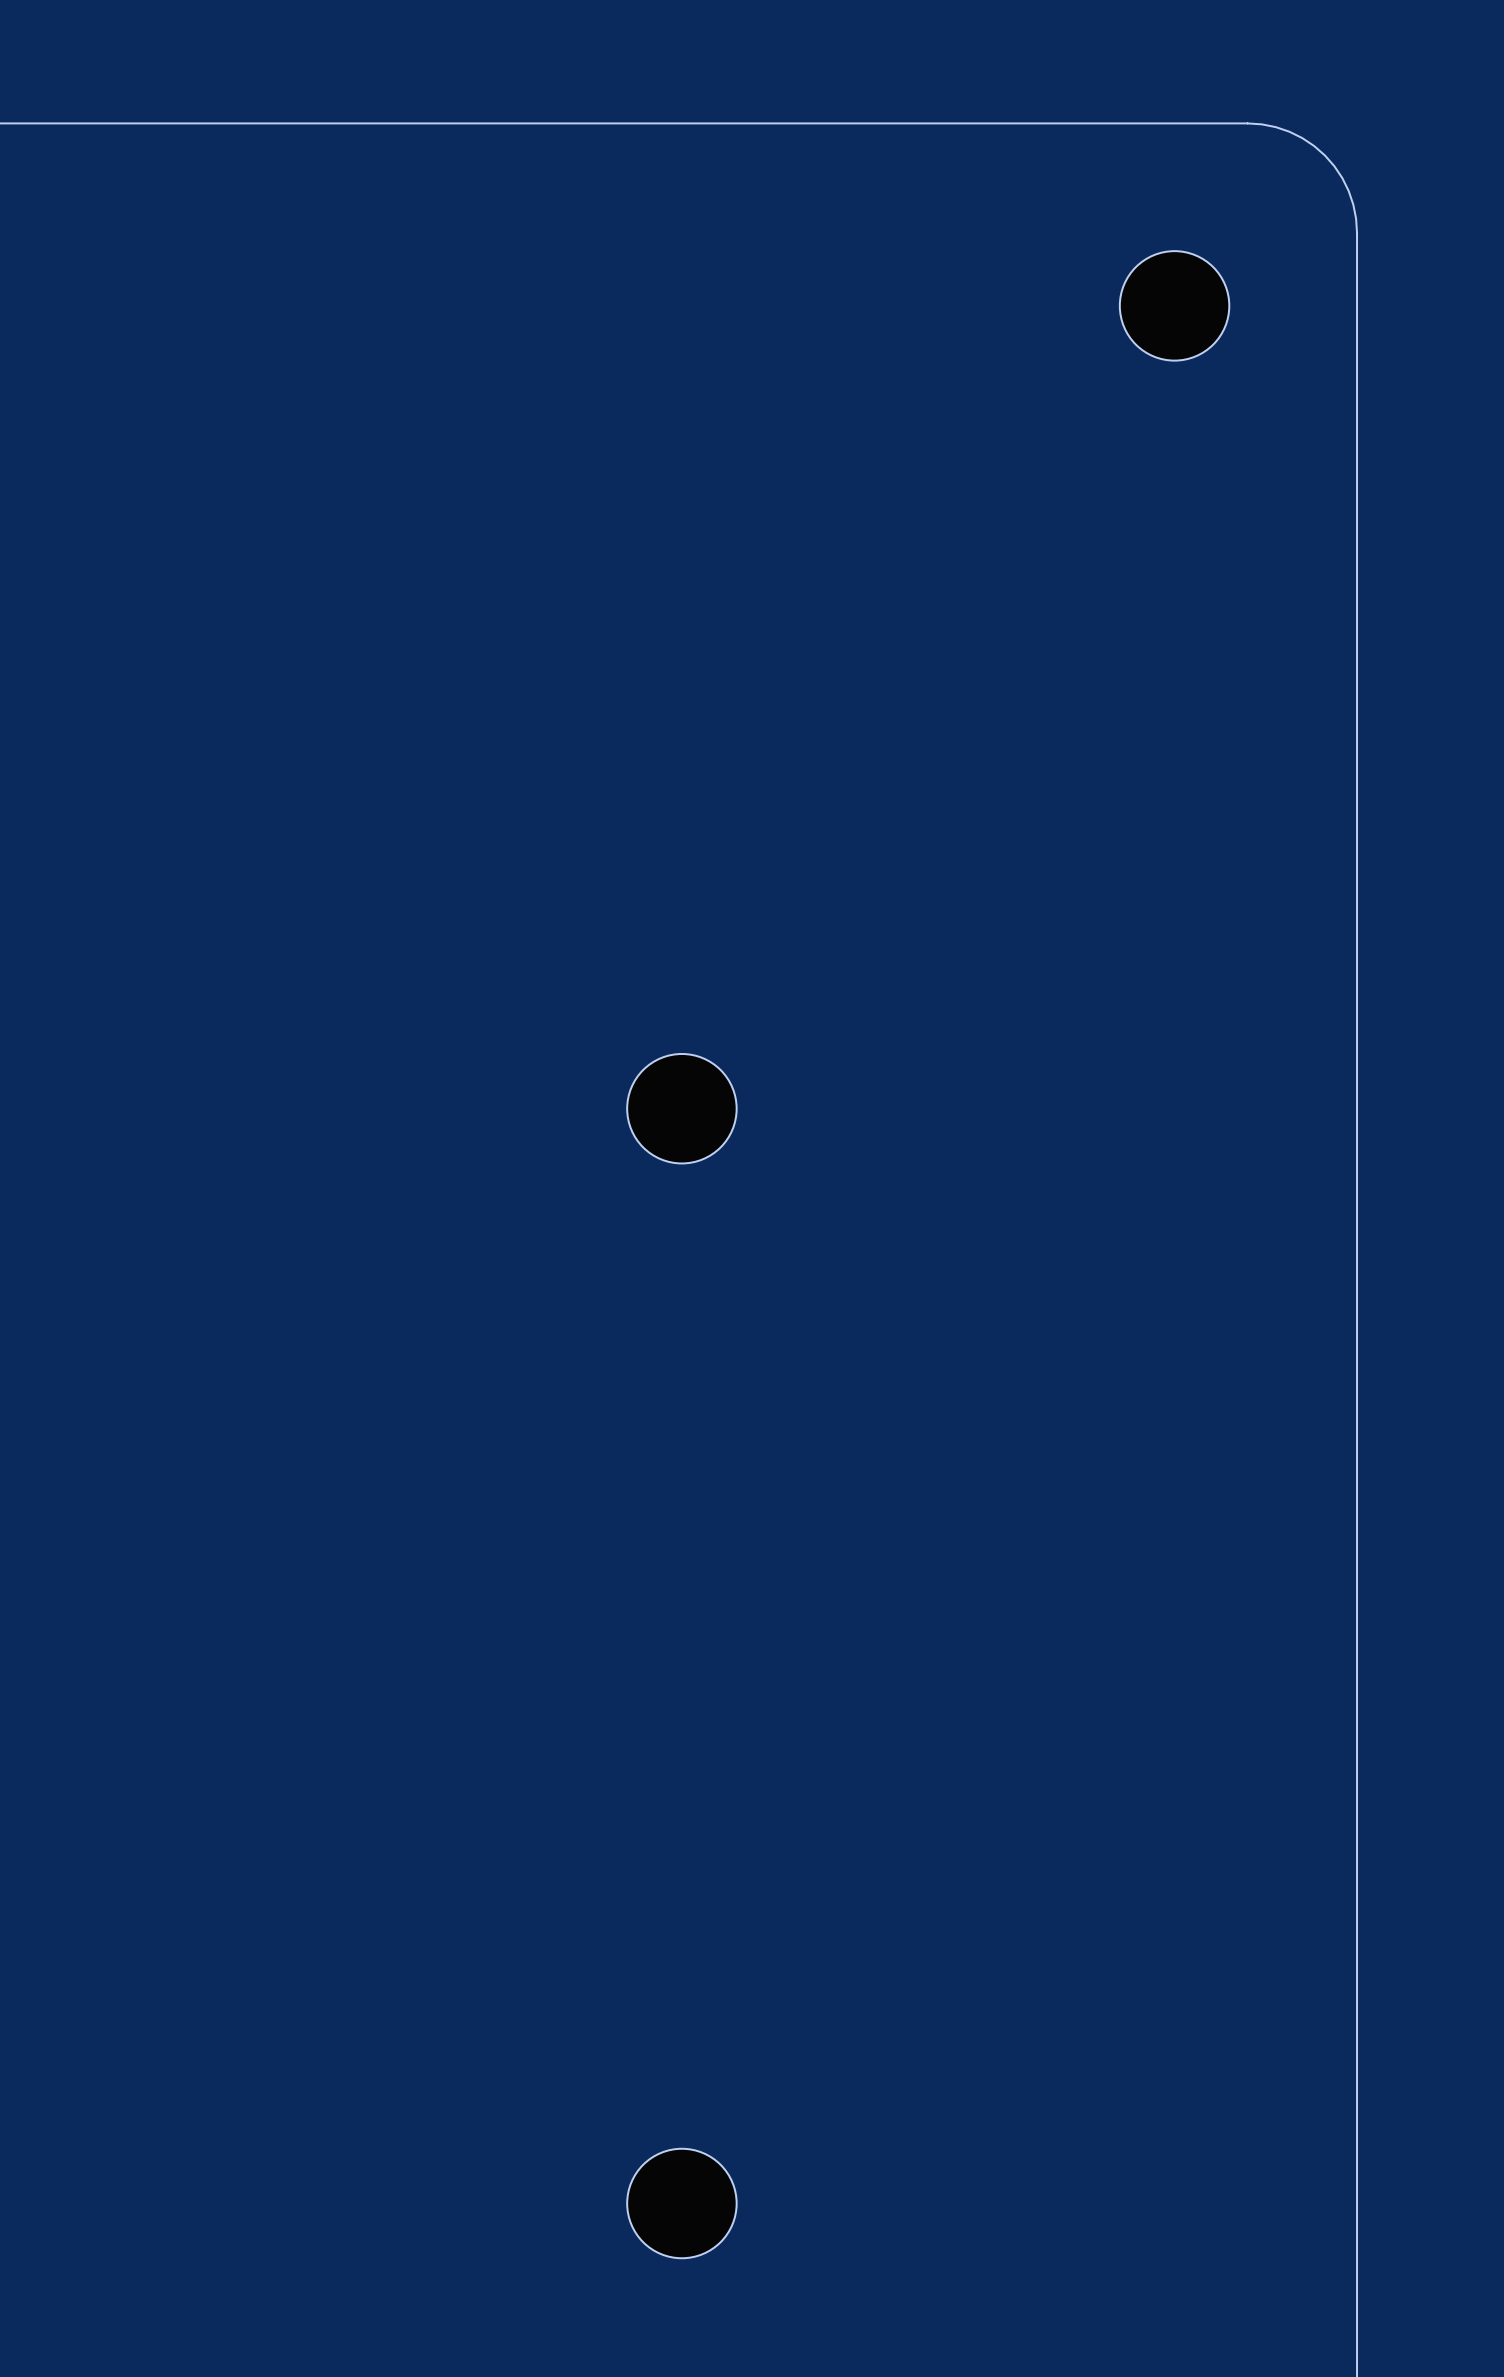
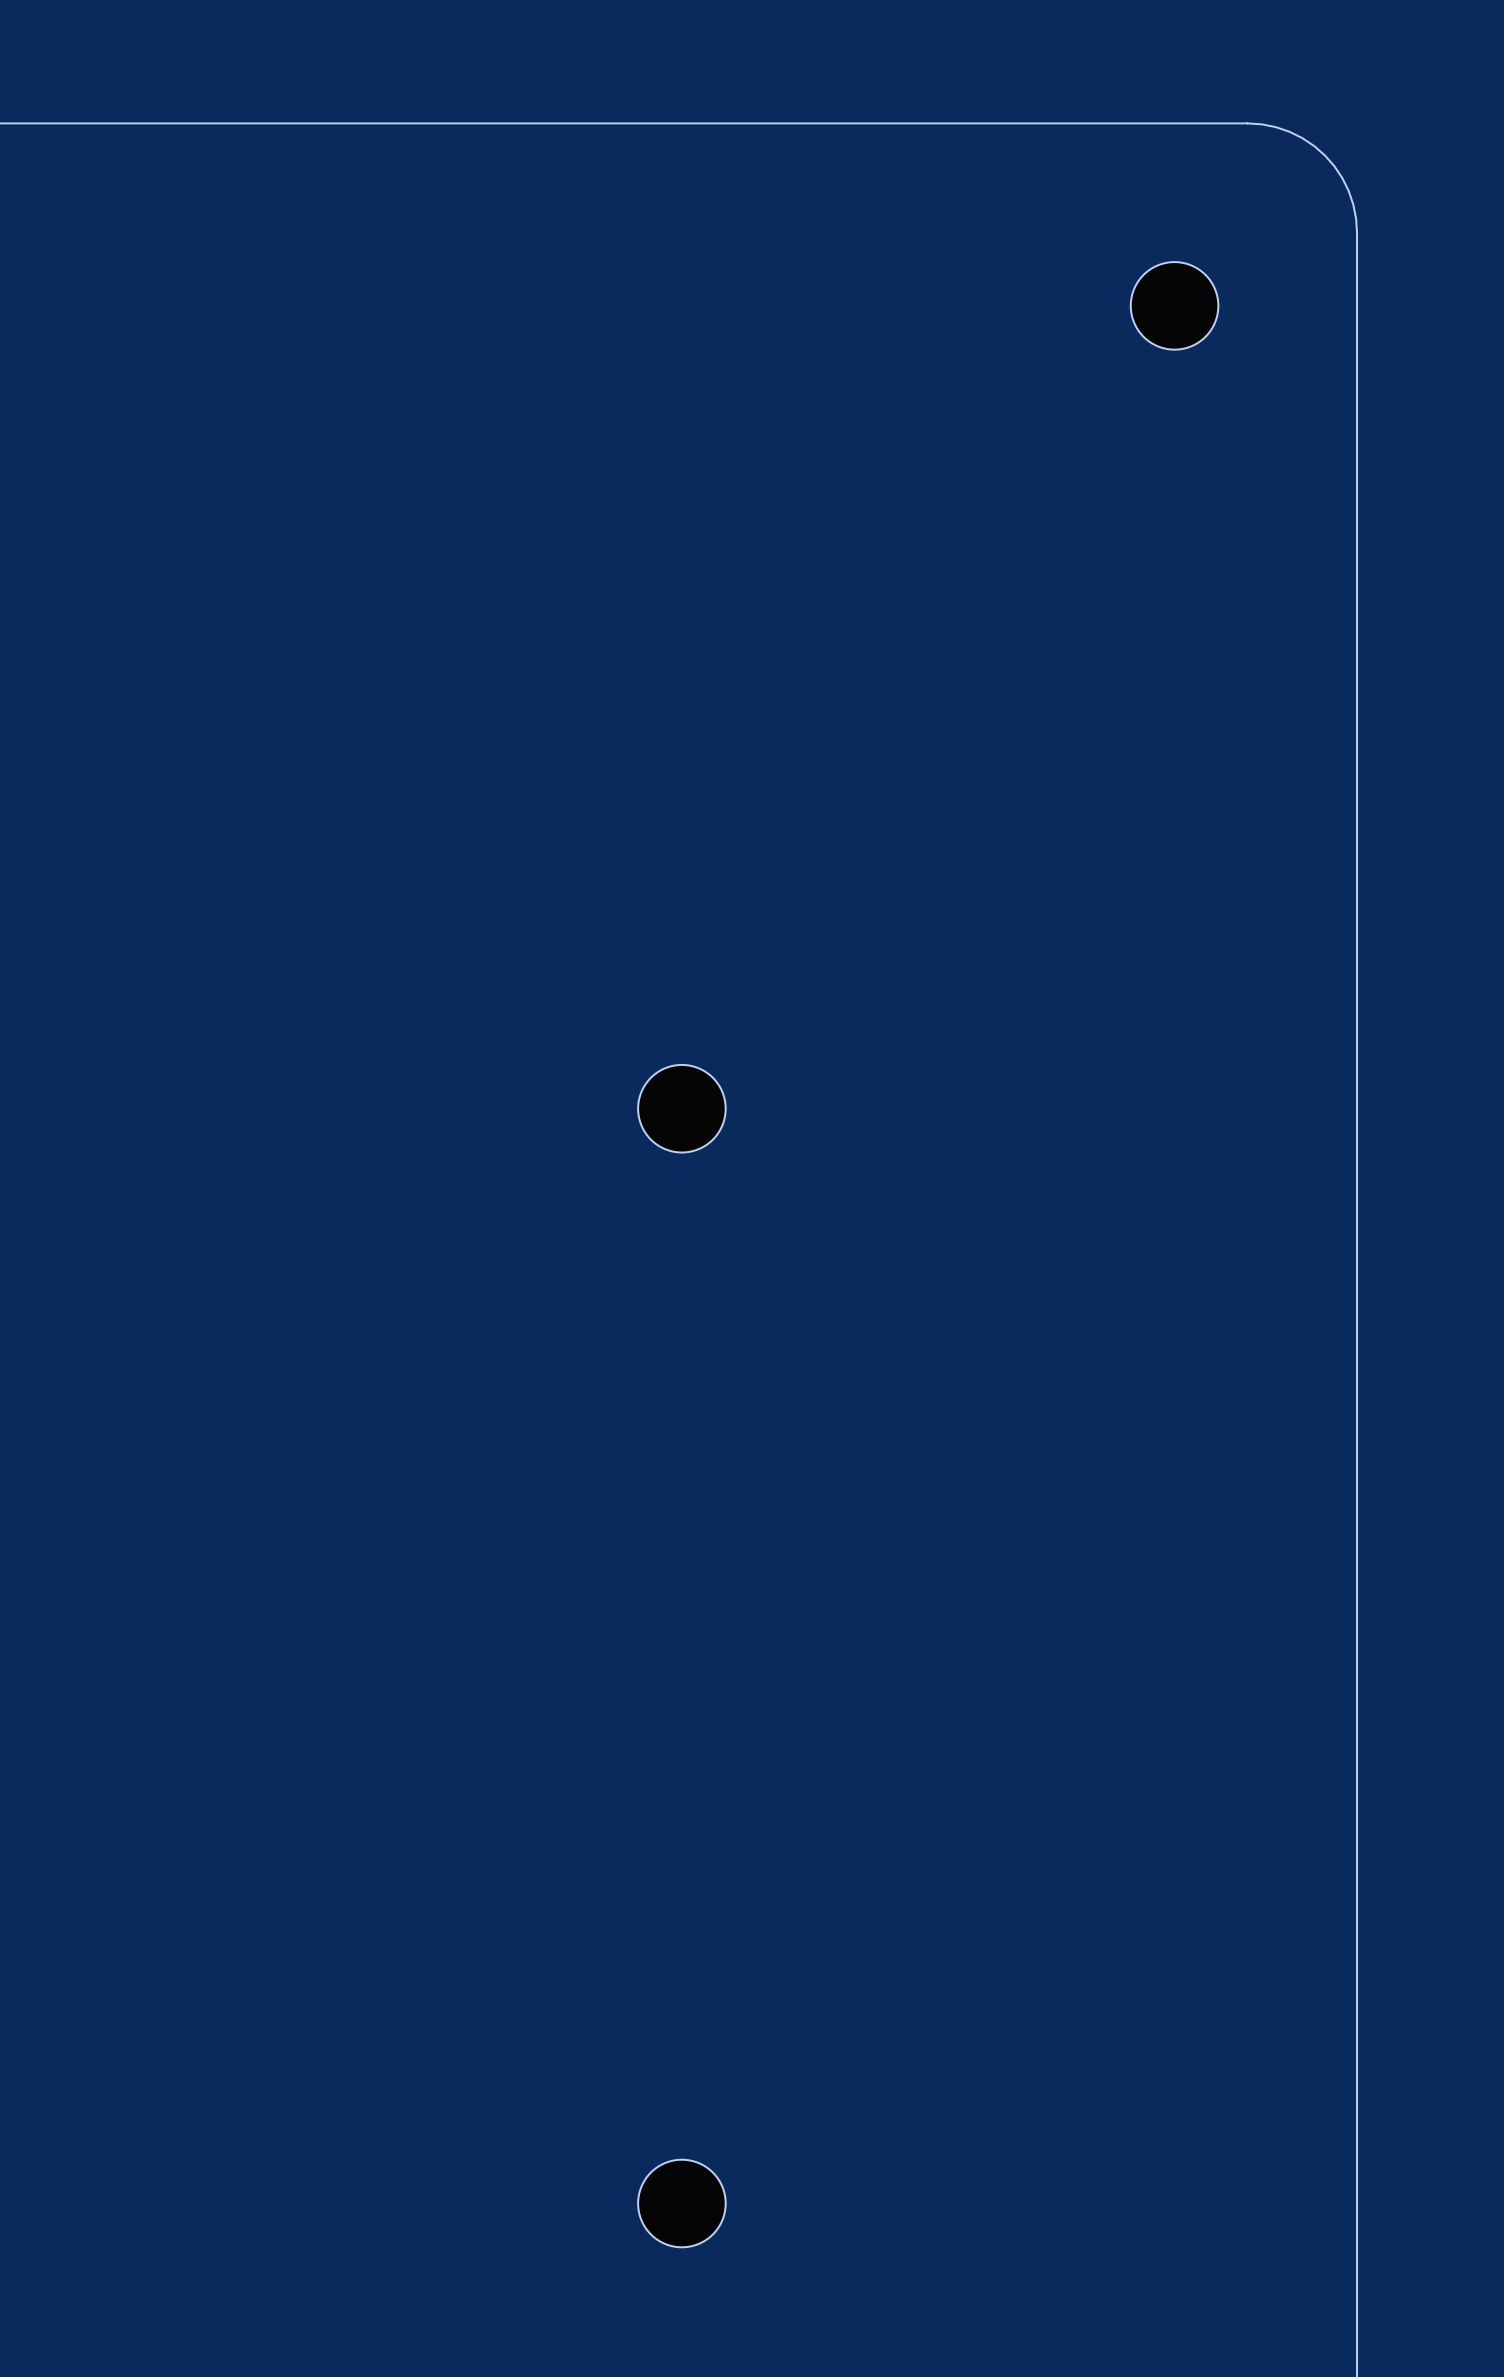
hole size: [1119, 251, 1230, 361] -> [1130, 262, 1219, 350]
hole size: [627, 1053, 737, 1164] -> [638, 1064, 726, 1153]
hole size: [627, 2148, 737, 2259] -> [638, 2159, 726, 2248]

